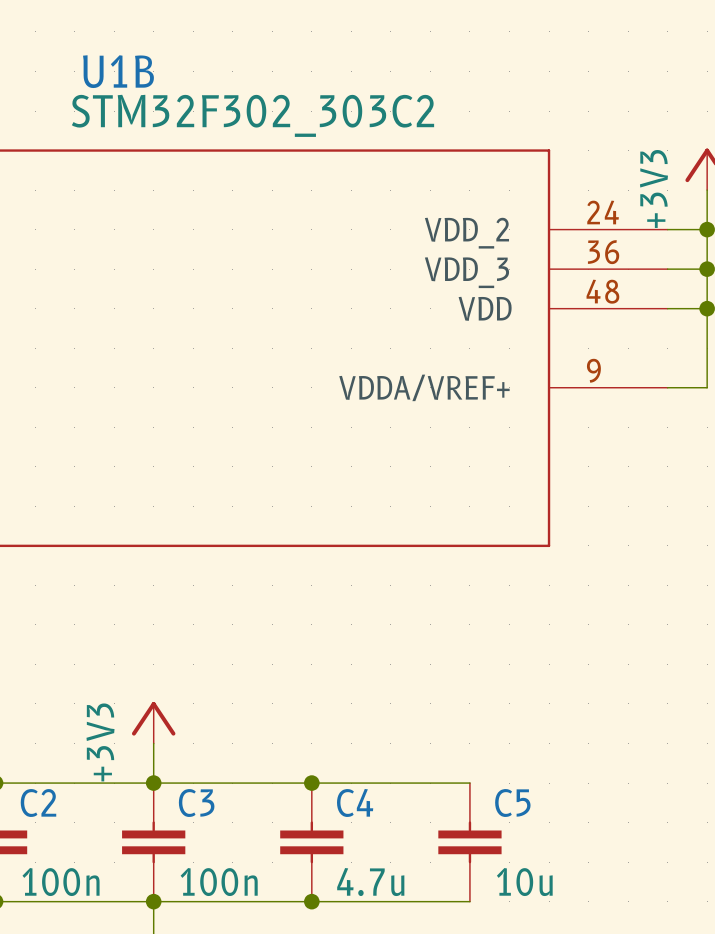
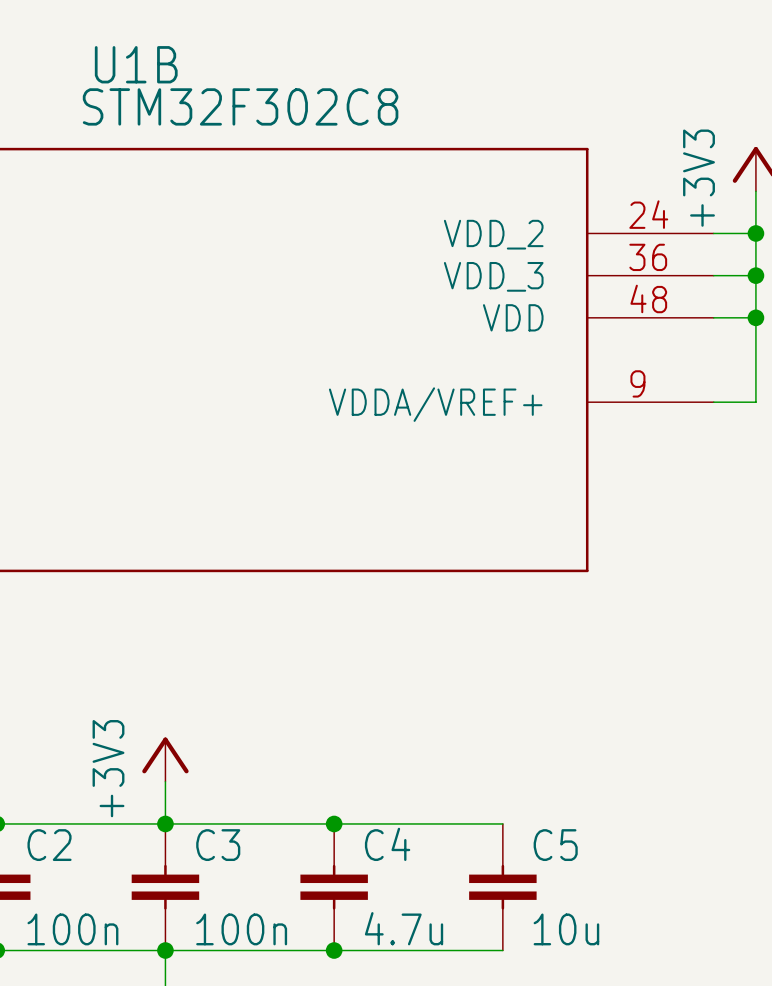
U1B value: STM32F302_303C2 (252, 115) -> STM32F302C8 (240, 106)

